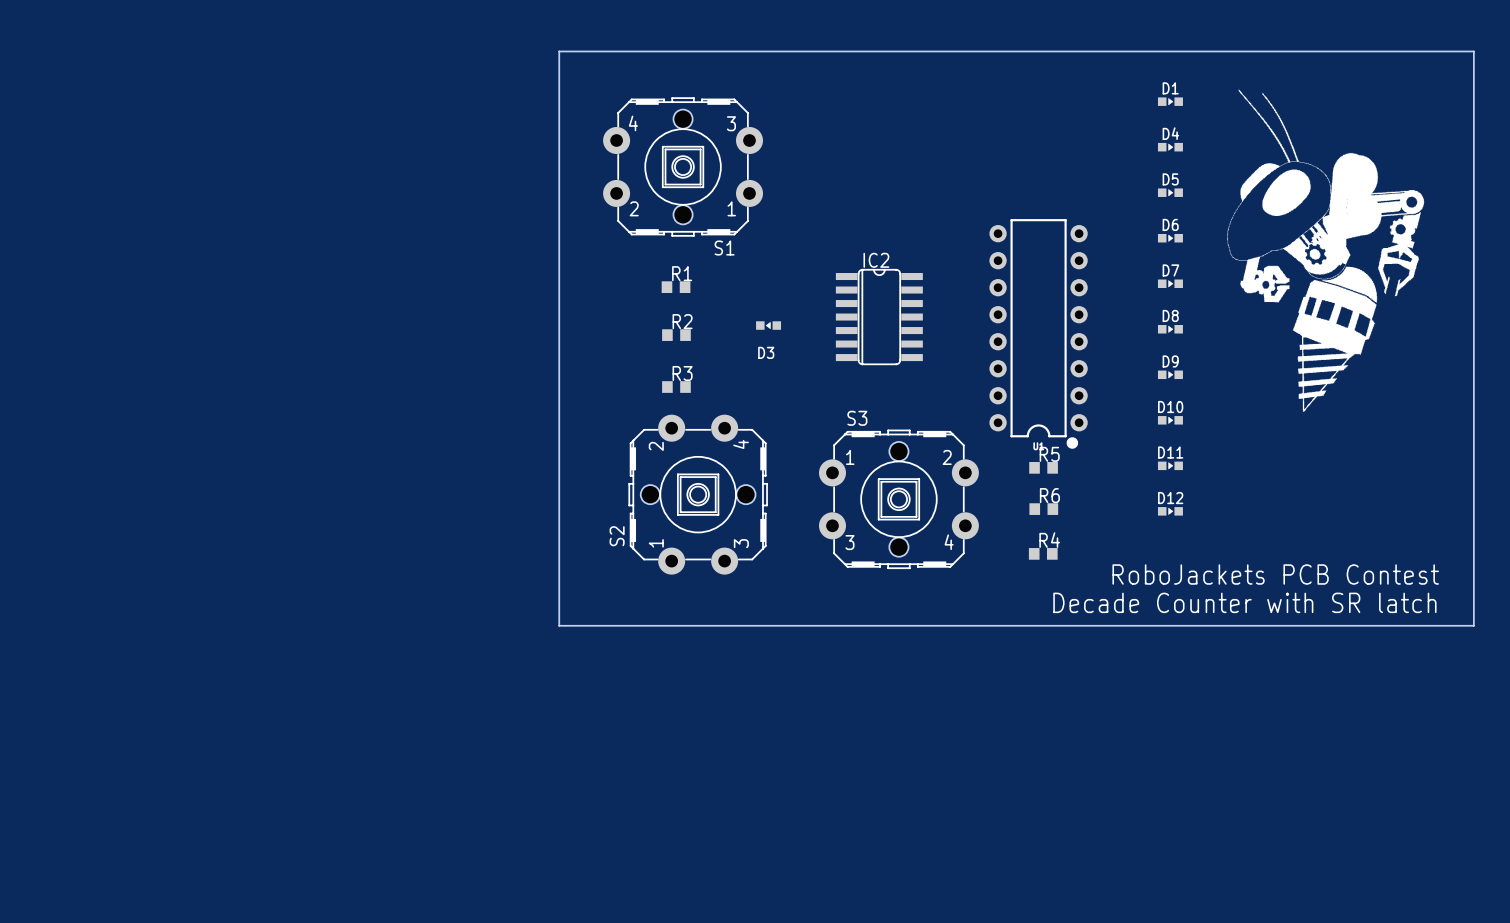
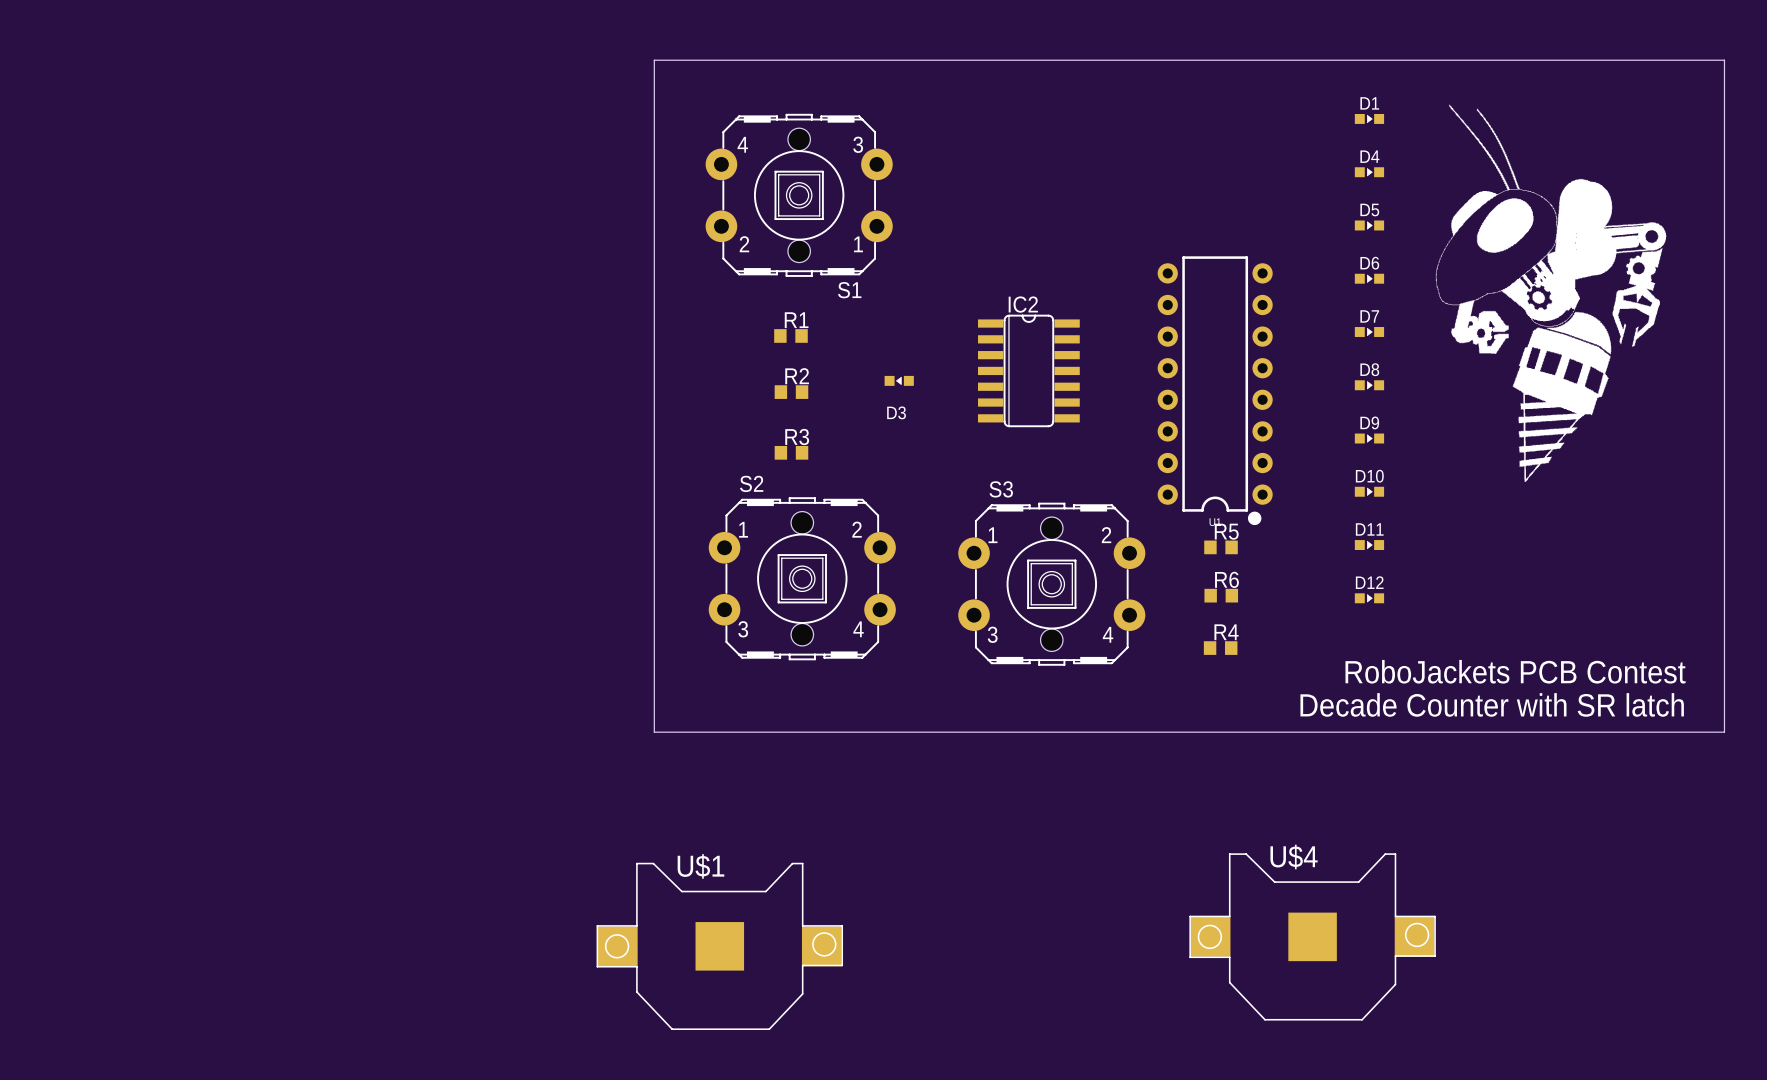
S2 rotation: 0° (698, 494) -> 90° clockwise (802, 578)
U$4: none -> (1312, 936)
U$1: none -> (719, 946)

